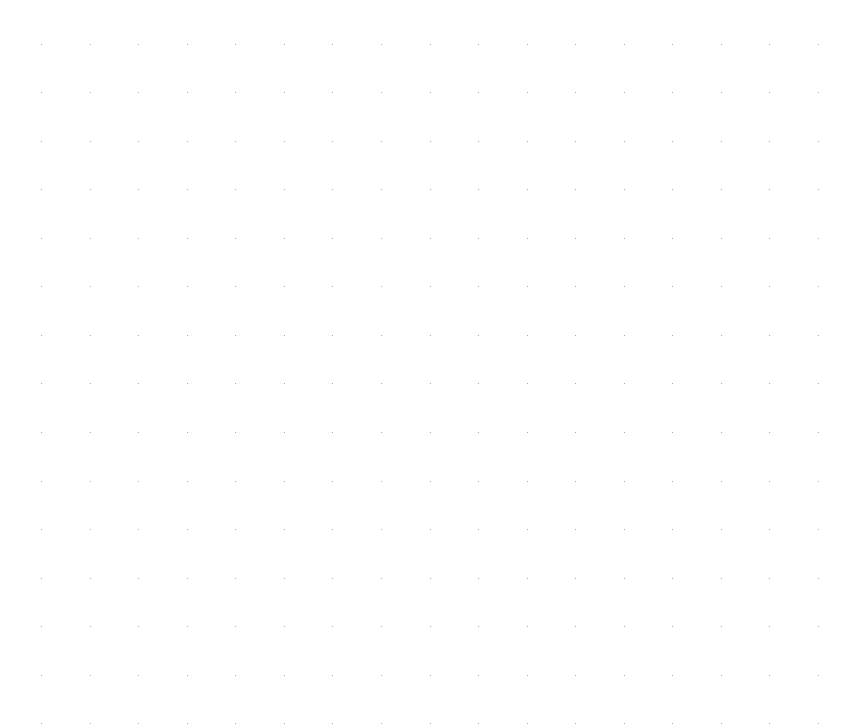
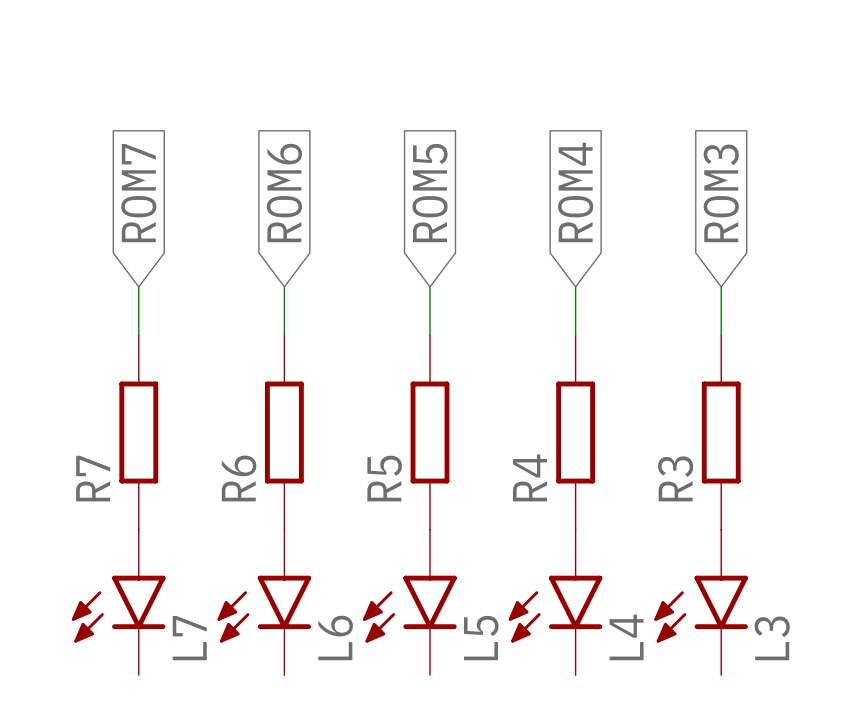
global label: none -> ROM6 (284, 192)
global label: none -> ROM4 (575, 192)
global label: none -> ROM7 (138, 193)
global label: none -> ROM5 (430, 193)
global label: none -> ROM3 (721, 193)
wire: none -> (138, 286) (138, 335)
wire: none -> (284, 286) (284, 335)
wire: none -> (430, 286) (430, 335)
wire: none -> (575, 286) (575, 335)
wire: none -> (721, 286) (721, 335)
R7: none -> (138, 432)
R6: none -> (284, 432)
R5: none -> (430, 432)
R4: none -> (575, 432)
R3: none -> (721, 432)
L7: none -> (118, 602)
L6: none -> (264, 602)
L5: none -> (409, 602)
L4: none -> (555, 602)
L3: none -> (701, 602)

